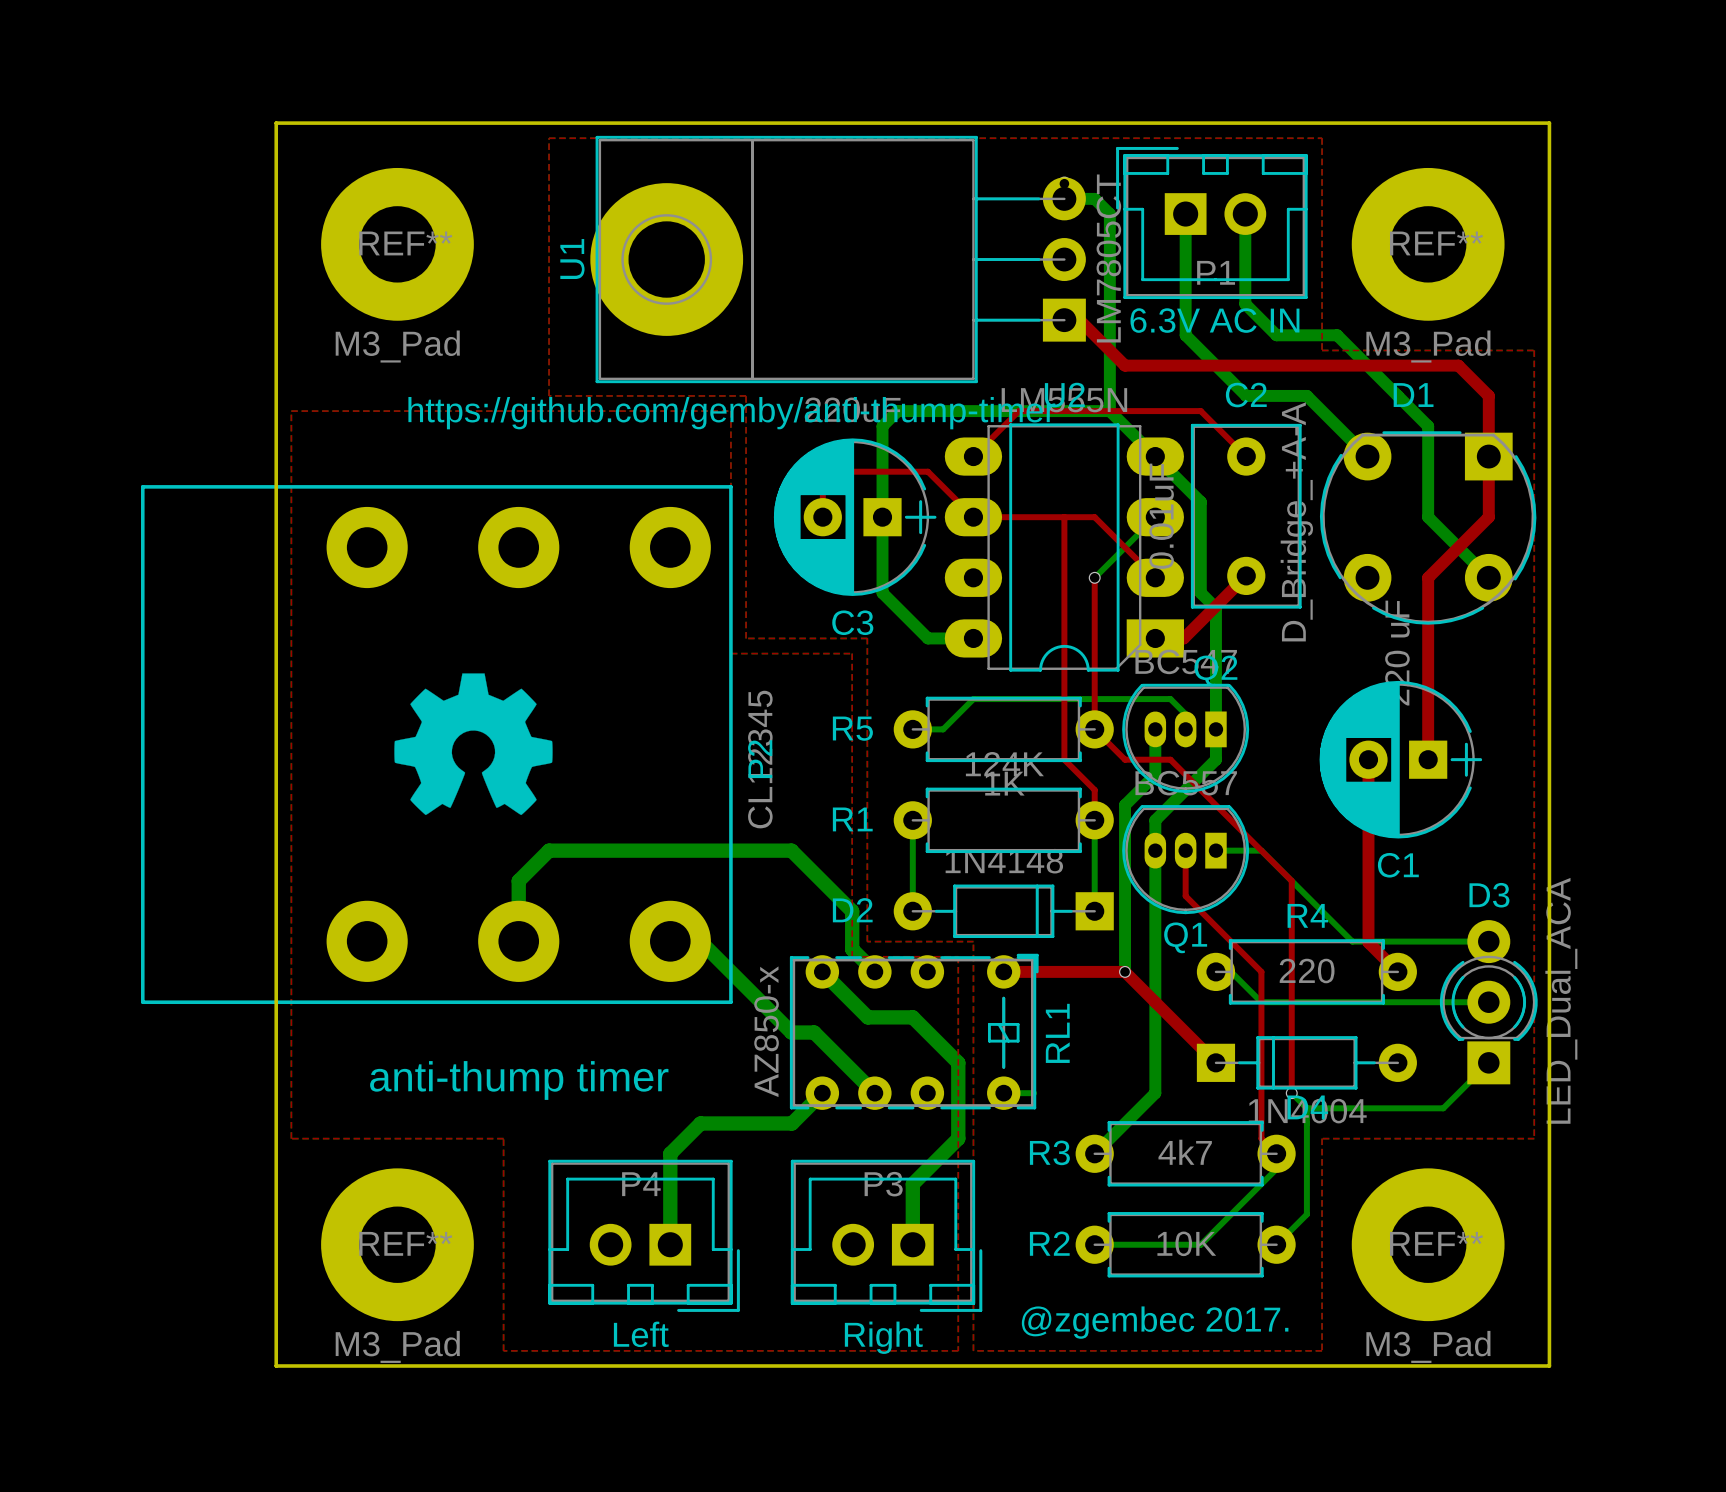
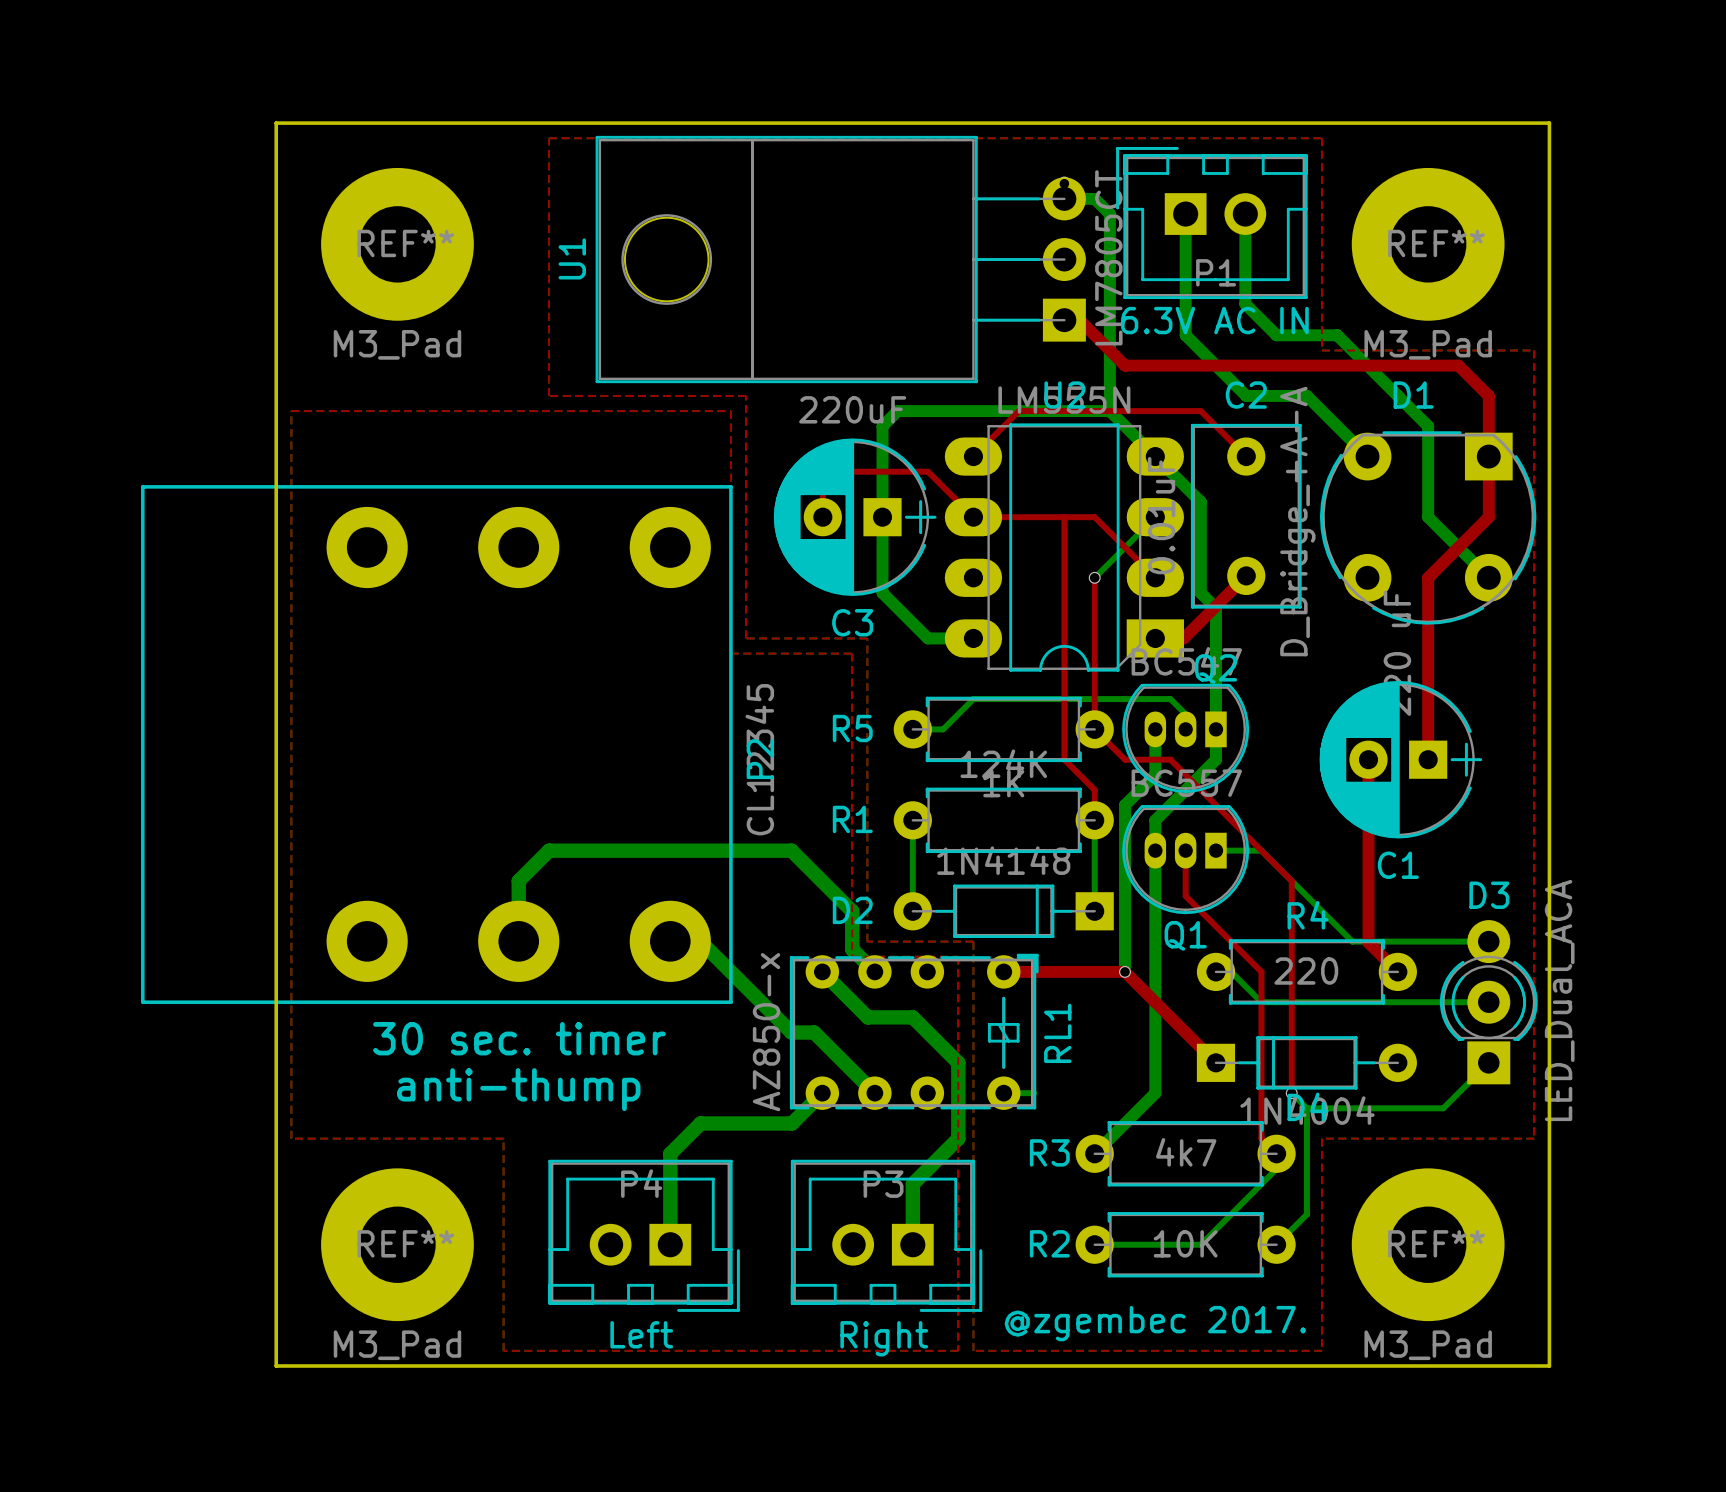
U1 footprint: [590, 135, 1086, 384] -> [595, 135, 1086, 384]
text: https://github.com/gemby/anti-thump-timer (731, 413) -> none
drawing: [394, 673, 553, 816] -> none
text: none -> 30 sec. timer (519, 1038)
text: anti-thump timer (519, 1080) -> anti-thump (518, 1089)

